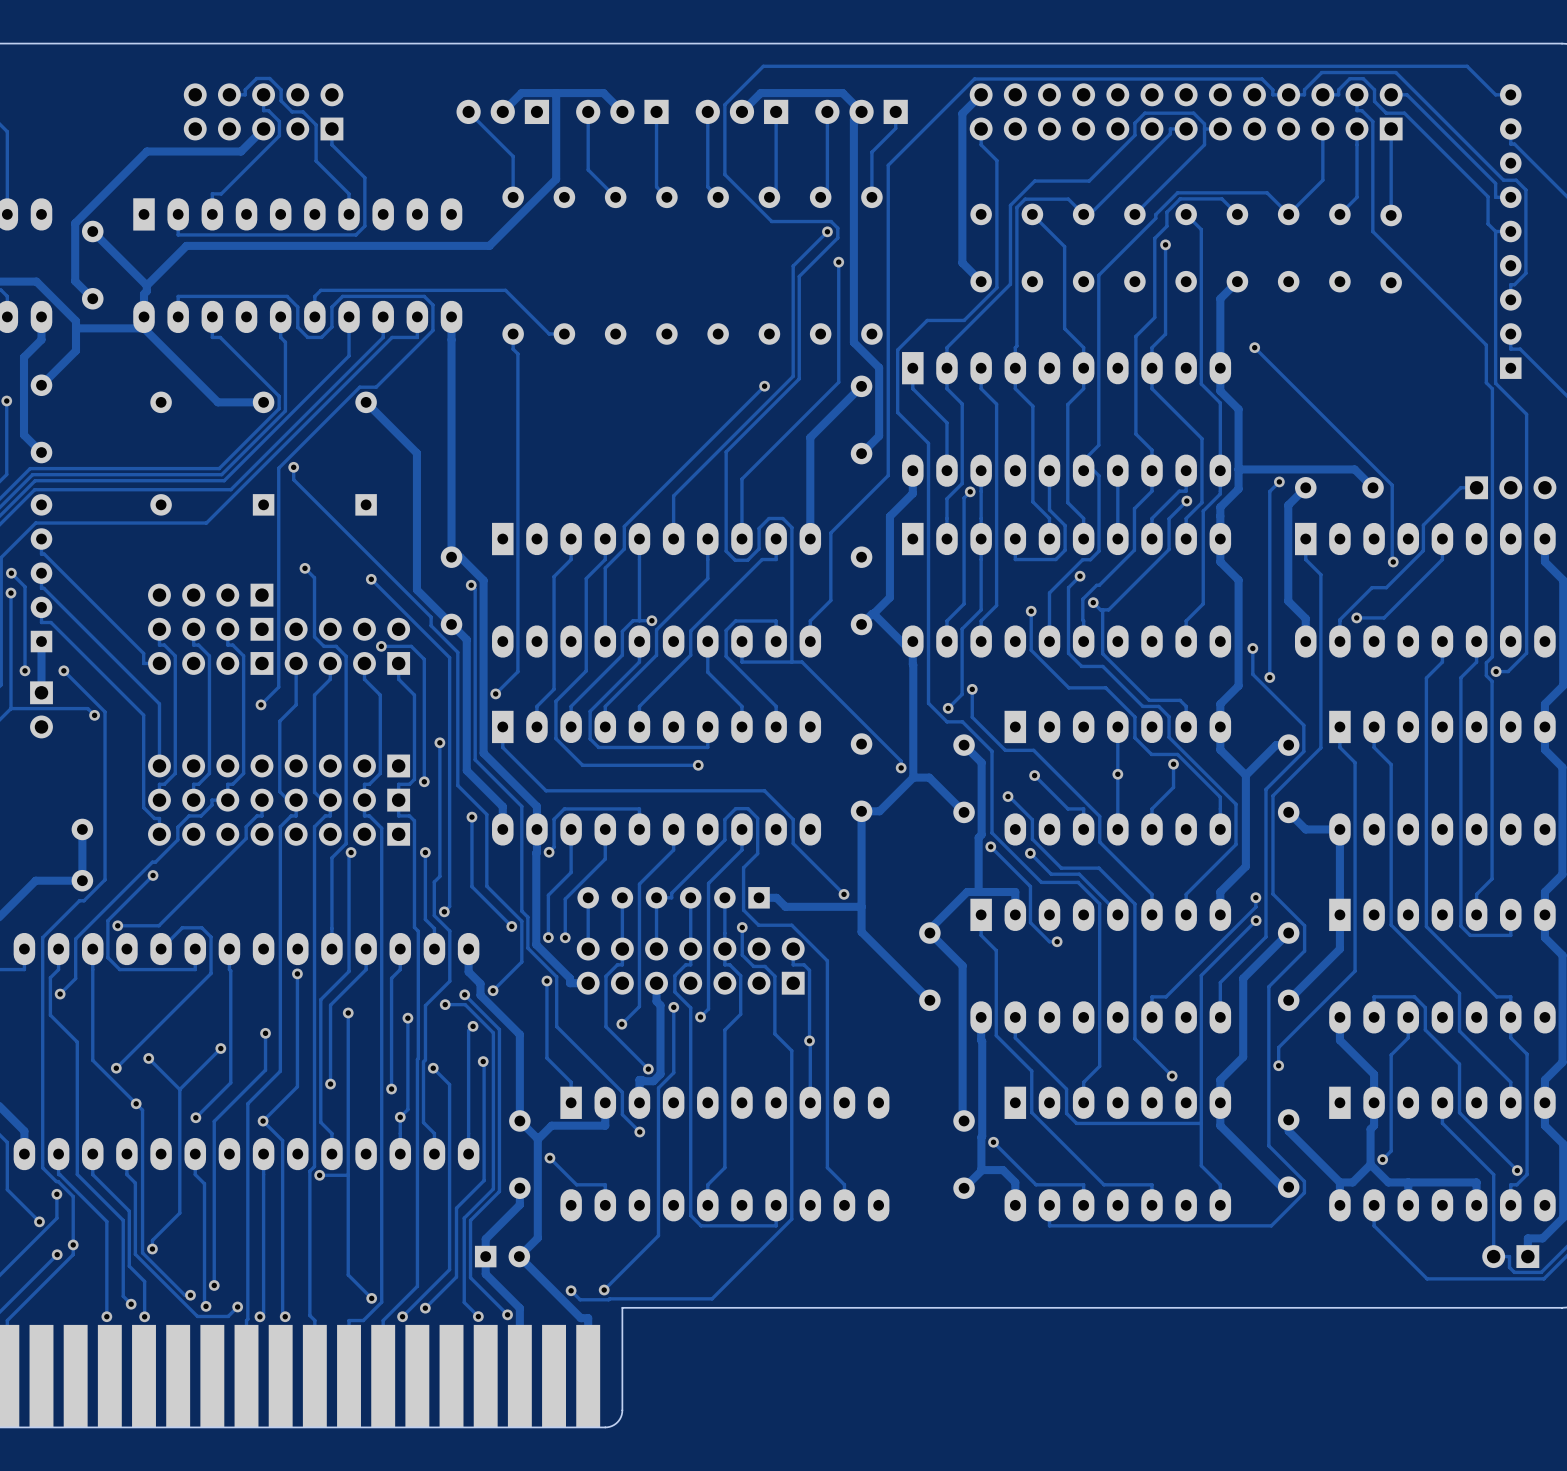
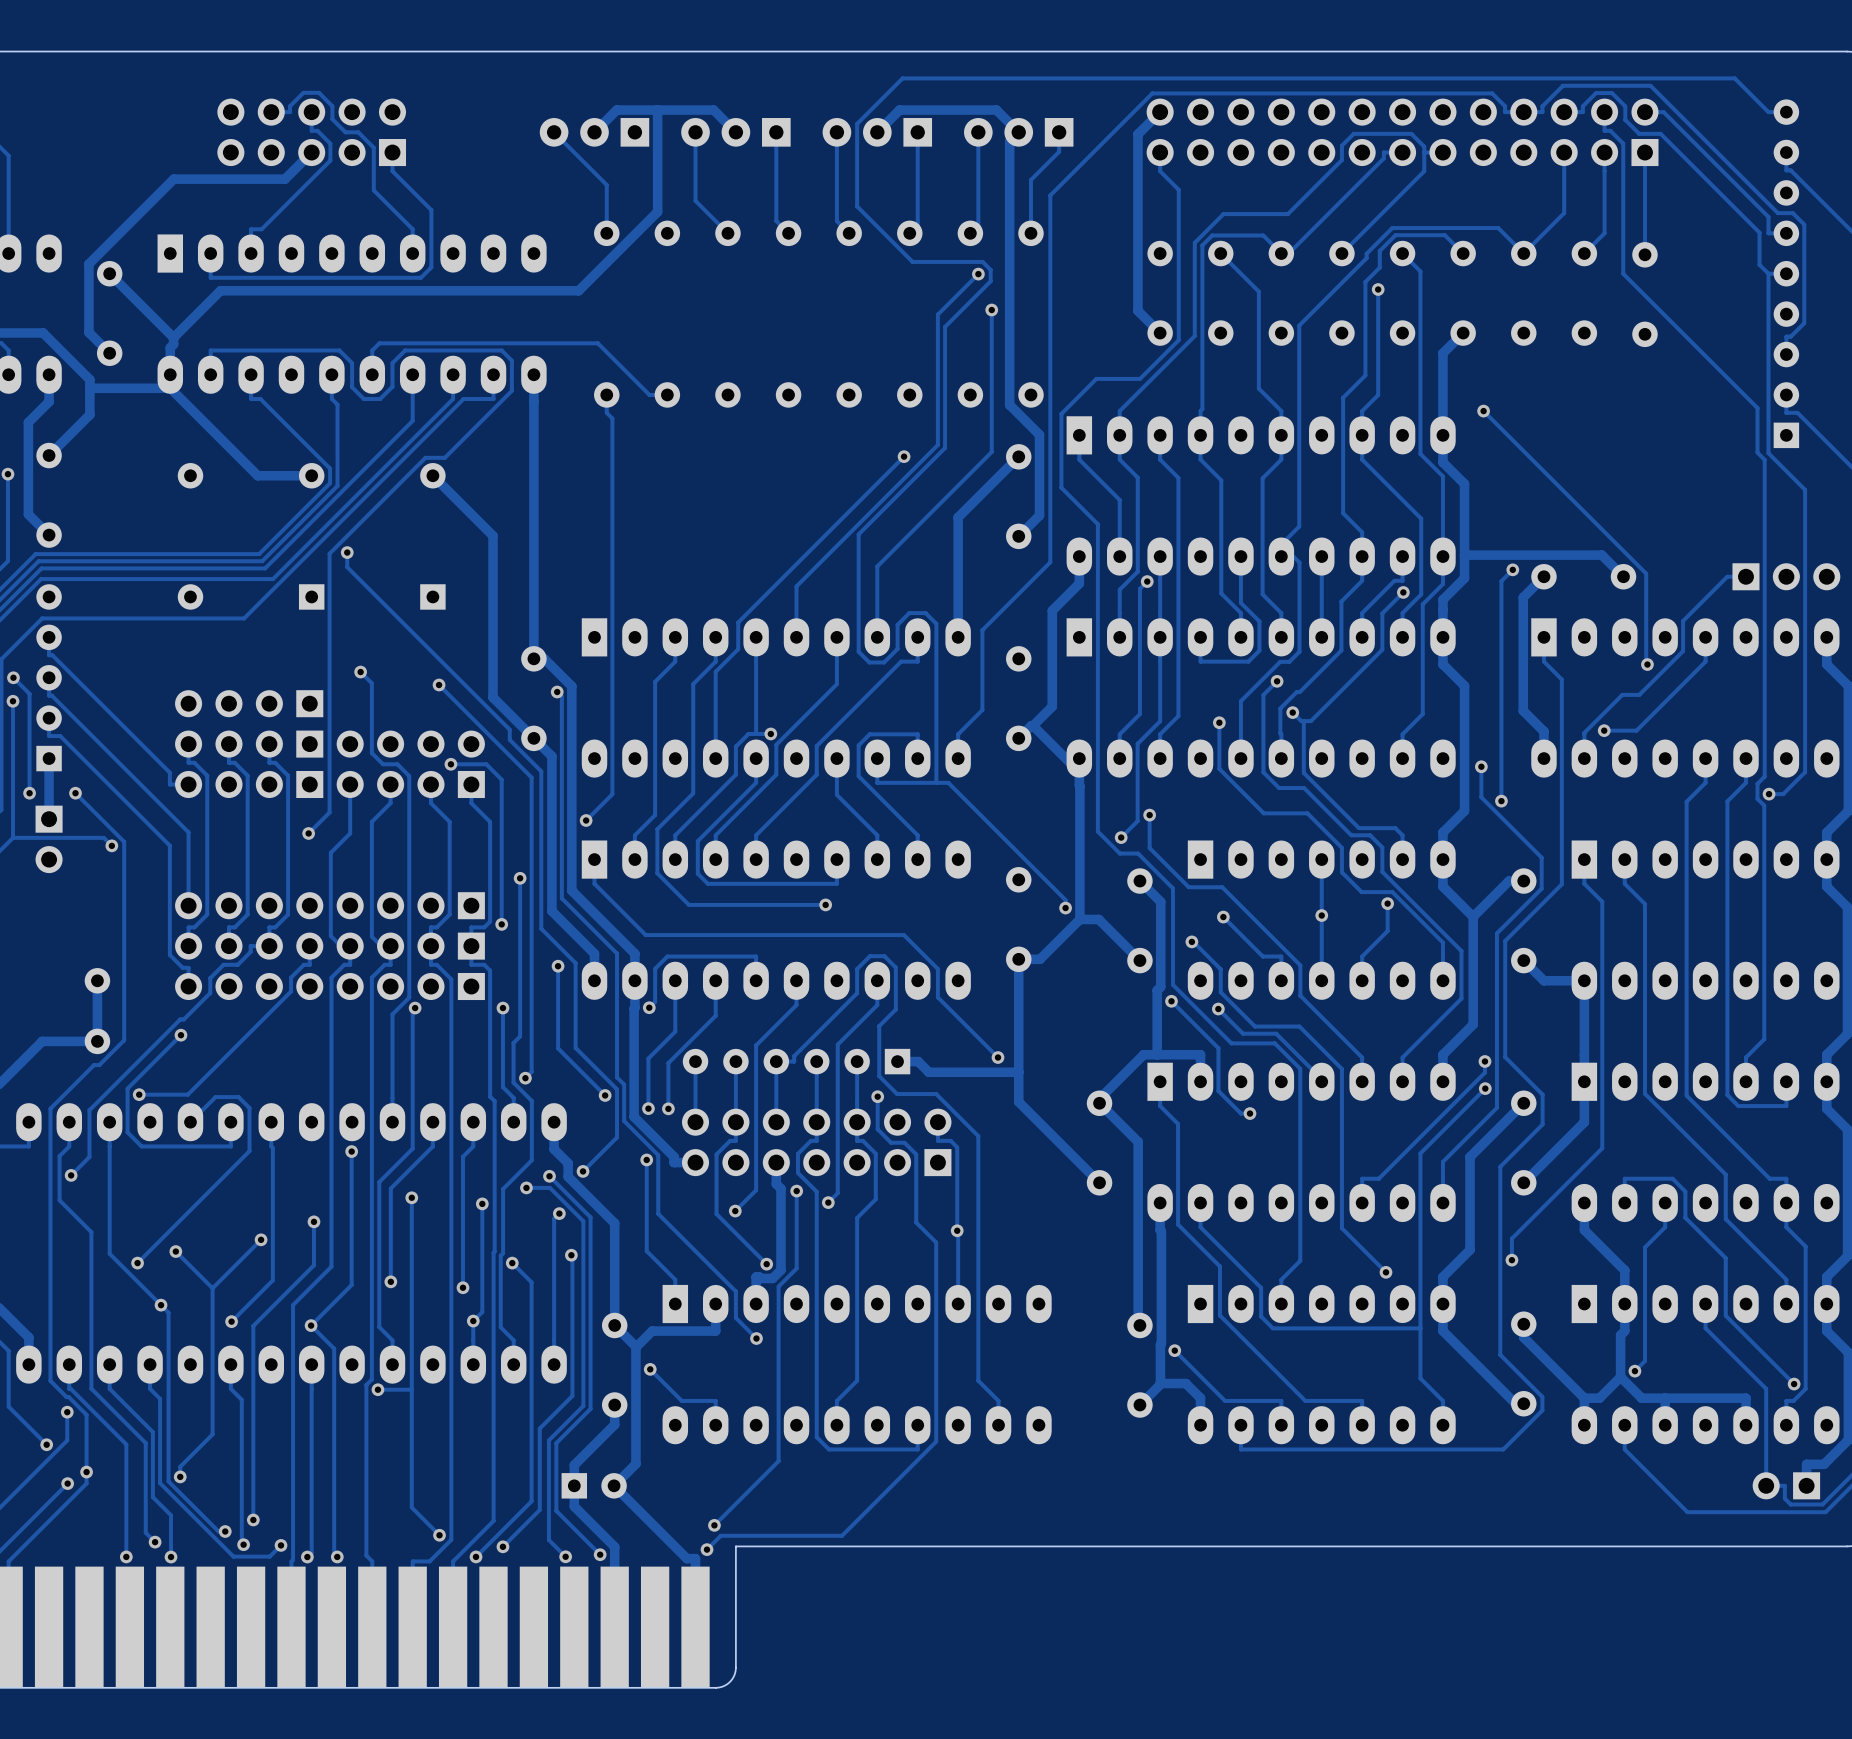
track: (571, 1290) (580, 1299) (608, 1299) -> (707, 1549) (719, 1536)
via position: (571, 1290) -> (707, 1549)

